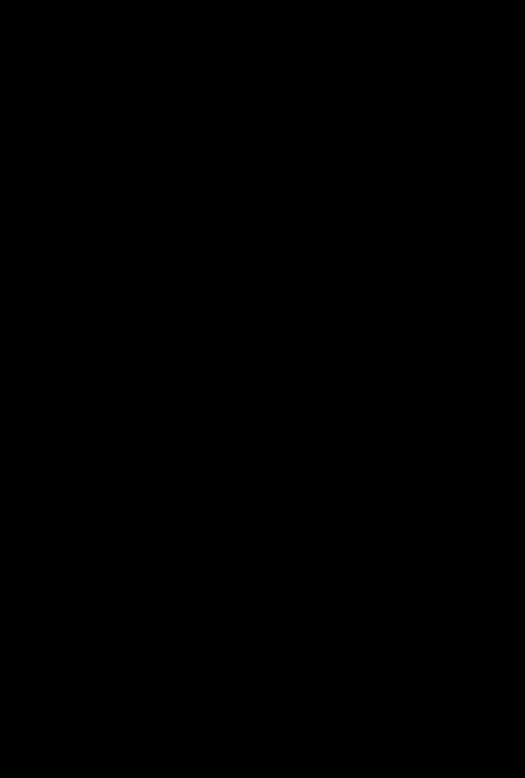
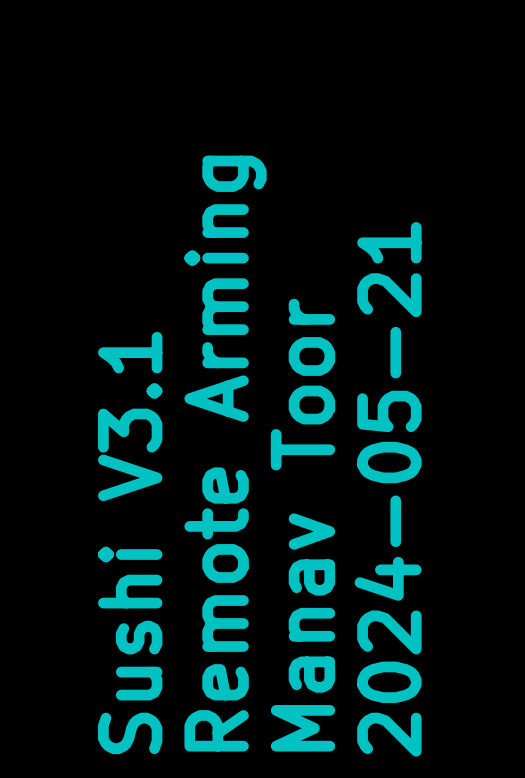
text: none -> Remote Arming (225, 453)
text: none -> 2024-05-21 (388, 489)
text: none -> Manav Toor (303, 525)
text: none -> Sushi V3.1 (130, 543)

